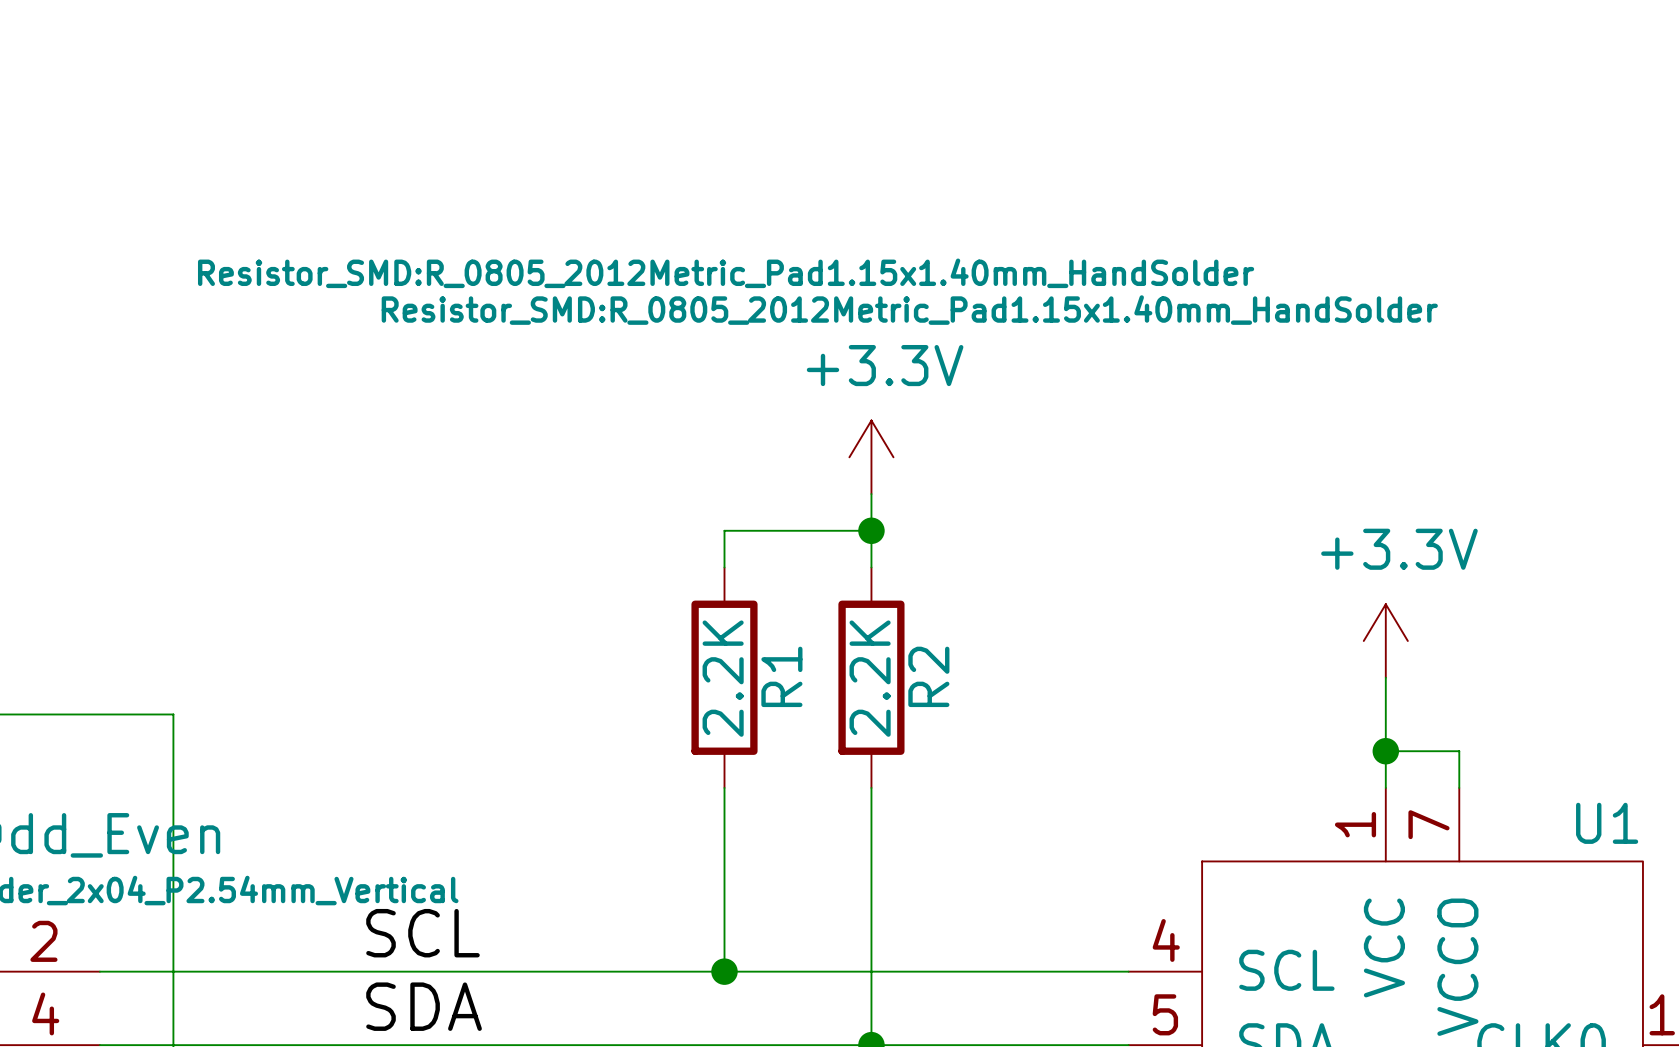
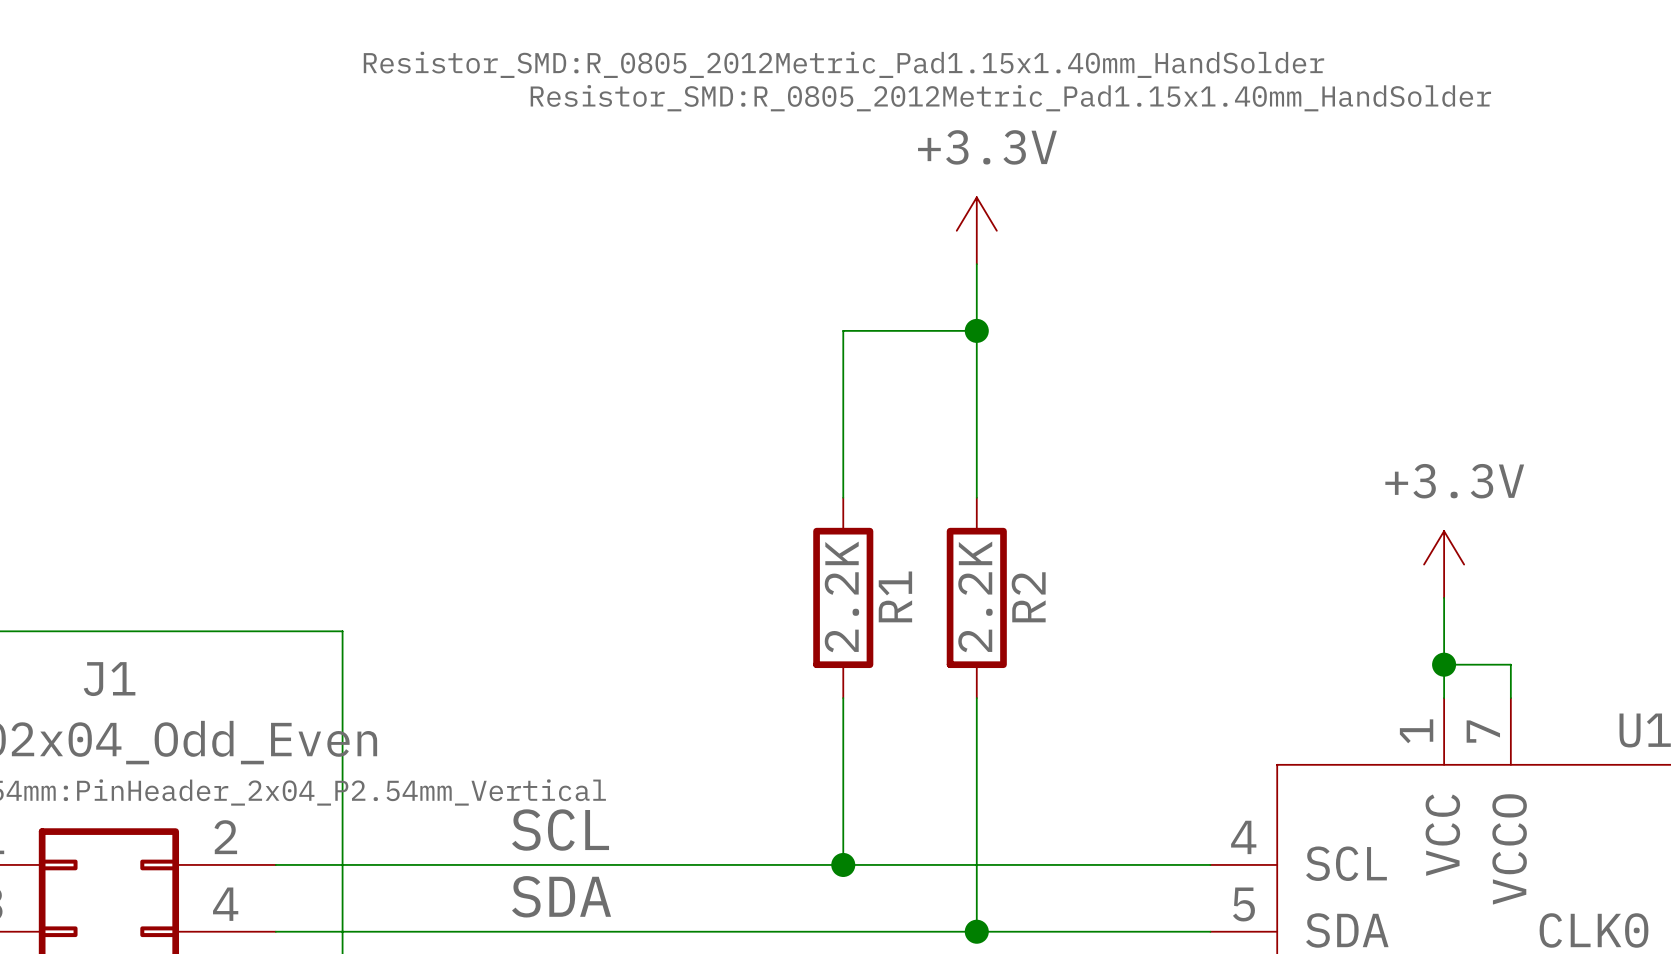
R1 text position: Resistor_SMD:R_0805_2012Metric_Pad1.15x1.40mm_HandSolder (726, 273) -> Resistor_SMD:R_0805_2012Metric_Pad1.15x1.40mm_HandSolder (843, 64)
wire: none -> (976, 264) (976, 431)
R2 text position: Resistor_SMD:R_0805_2012Metric_Pad1.15x1.40mm_HandSolder (909, 310) -> Resistor_SMD:R_0805_2012Metric_Pad1.15x1.40mm_HandSolder (1010, 98)
power symbol position: +3.3V (871, 457) -> +3.3V (976, 230)
wire: (724, 530) (871, 530) -> (843, 464) (843, 330) (976, 330)
junction position: (871, 530) -> (976, 330)

